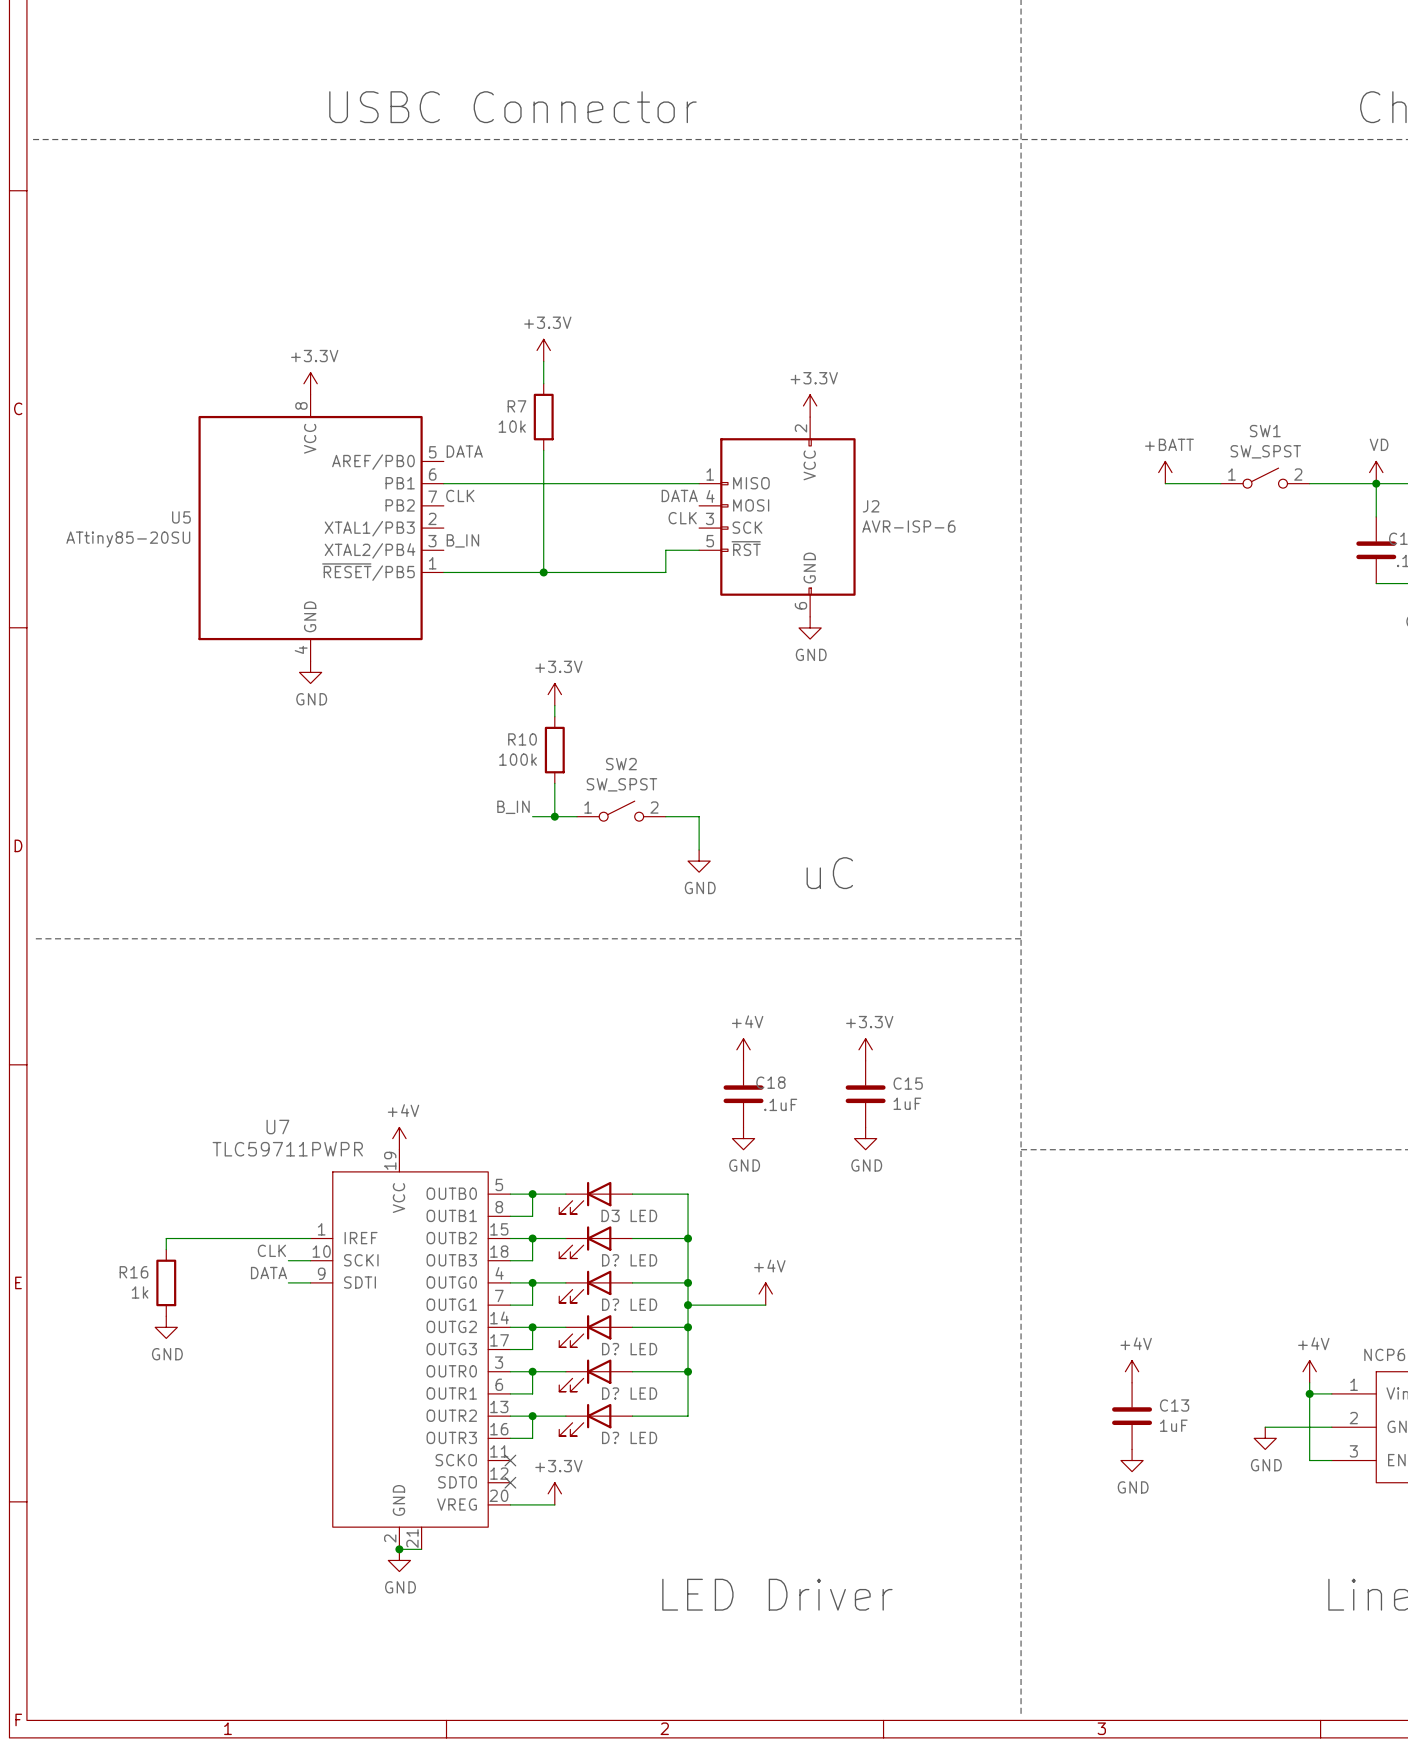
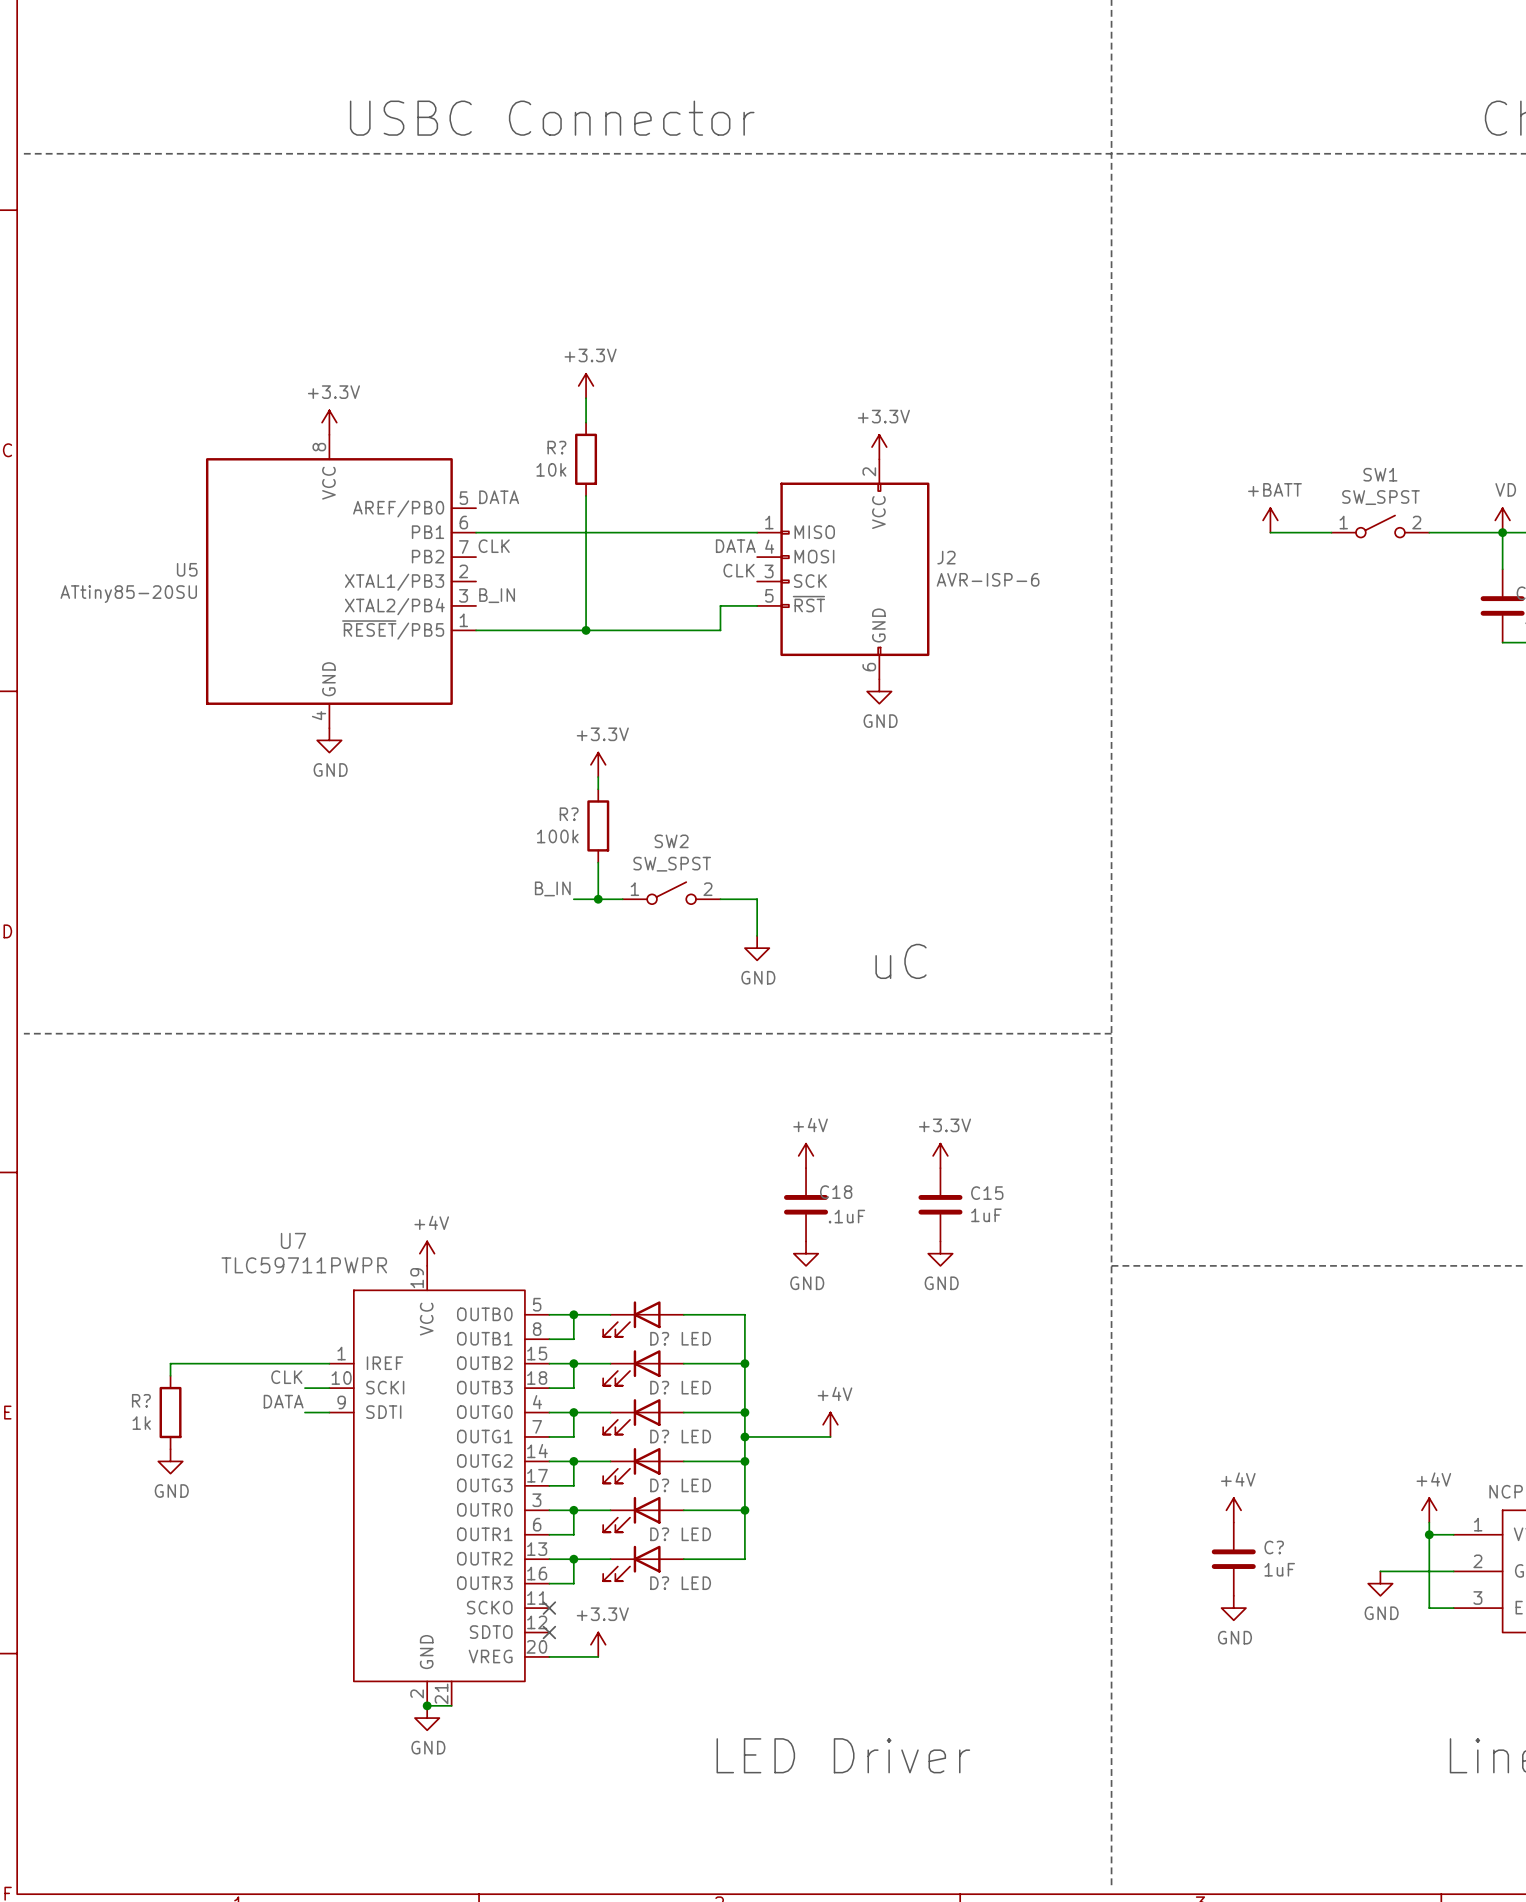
R7 name: R7 (516, 406) -> R? (556, 447)
R10 name: R10 (522, 739) -> R? (569, 814)
D3 name: D3 (610, 1215) -> D? (659, 1338)
R16 name: R16 (134, 1272) -> R? (141, 1400)
C13 name: C13 (1174, 1405) -> C? (1274, 1547)

